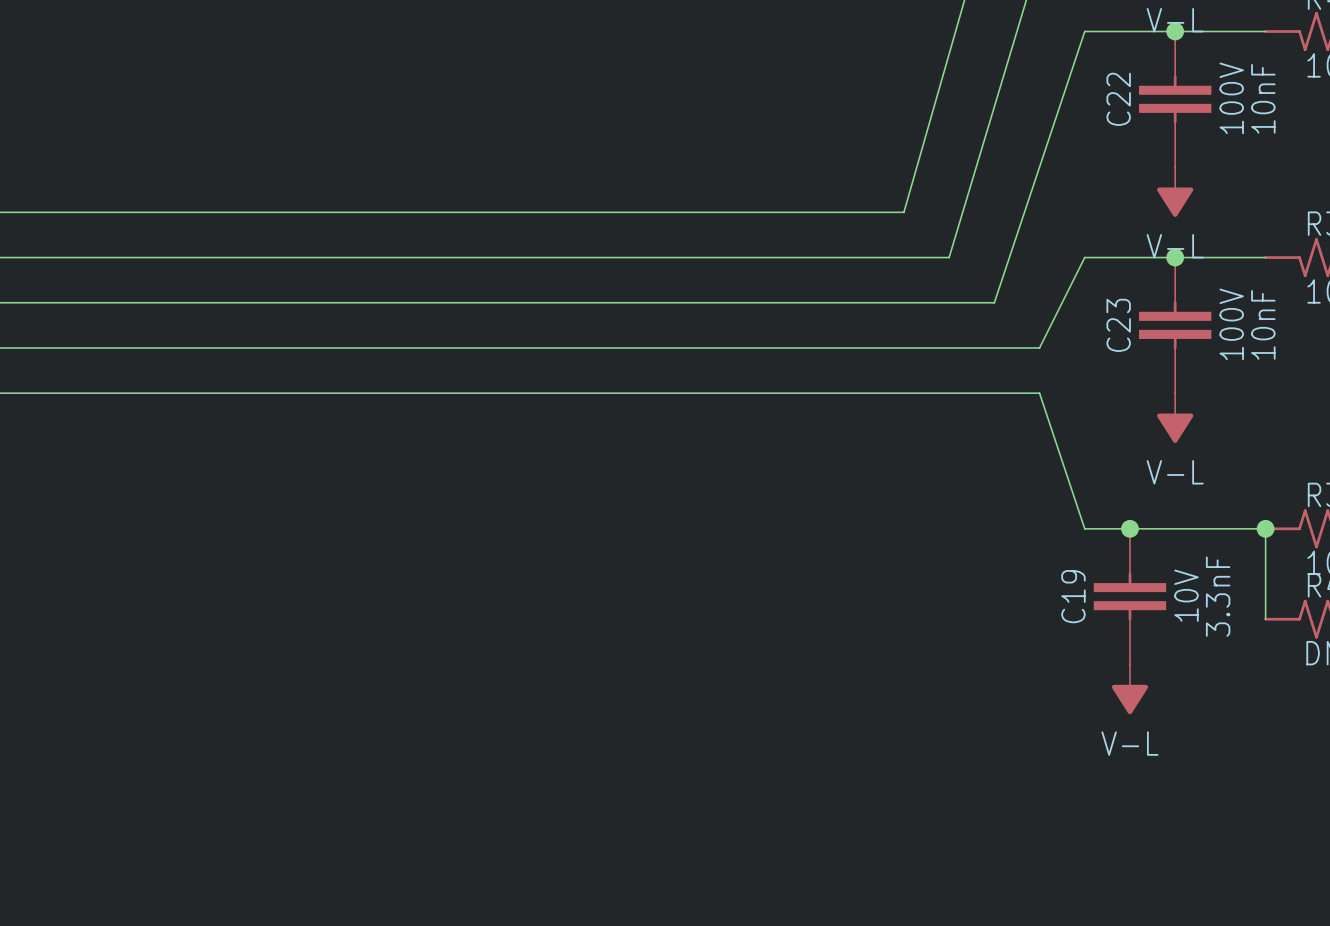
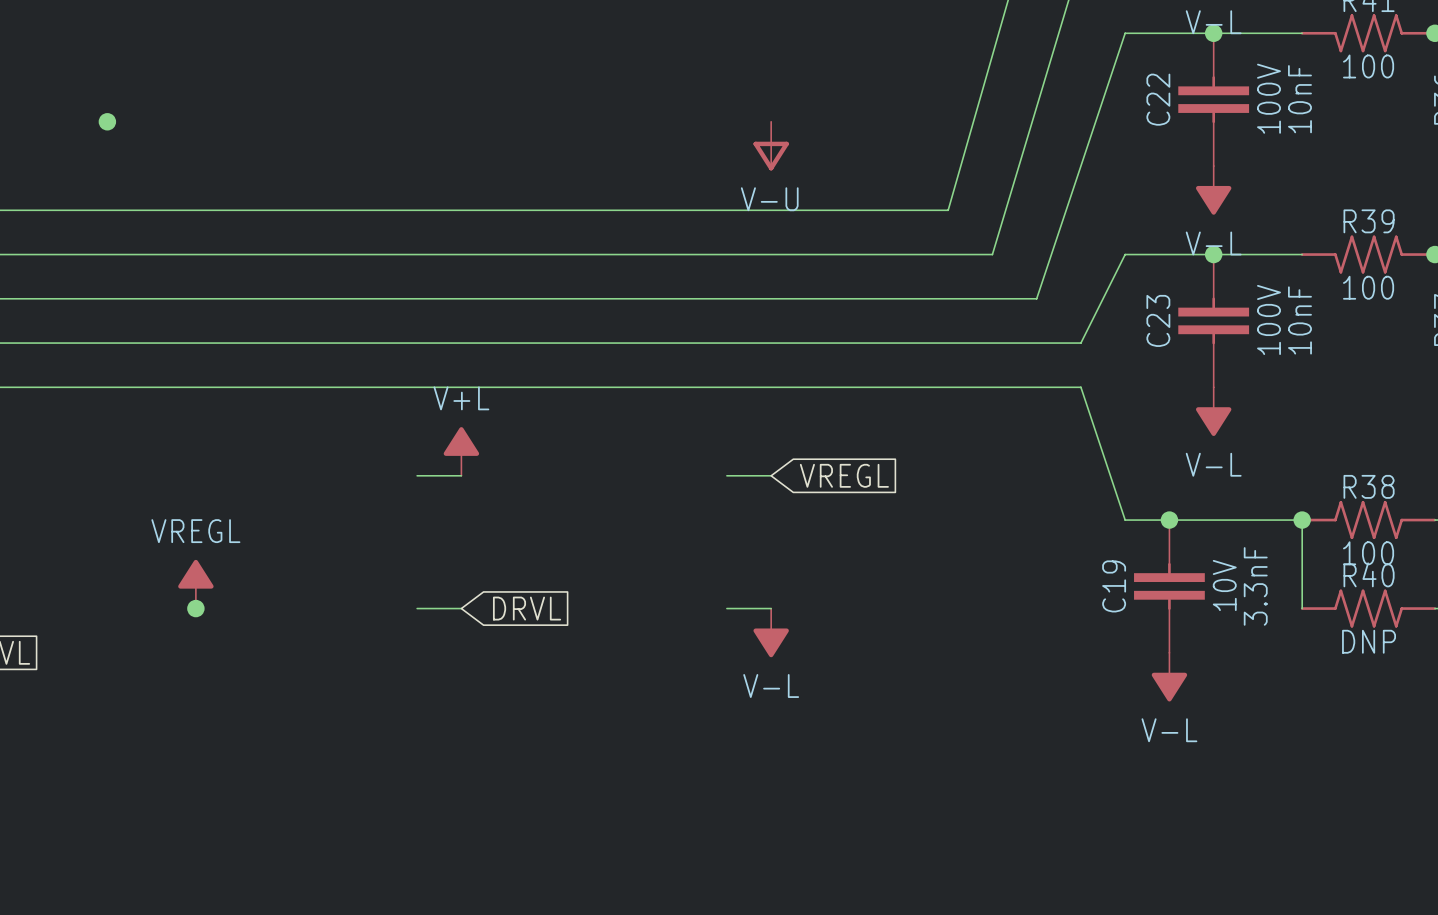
junction: none -> (107, 121)
power symbol: none -> V-U (771, 146)
power symbol: none -> V+L (461, 451)
wire: none -> (417, 475) (461, 475)
wire: none -> (726, 475) (771, 475)
global label: none -> VREGL (844, 475)
power symbol: none -> VREGL (195, 584)
junction: none -> (195, 608)
wire: none -> (417, 608) (461, 608)
global label: none -> DRVL (527, 608)
wire: none -> (726, 608) (771, 608)
power symbol: none -> V-L (771, 632)

